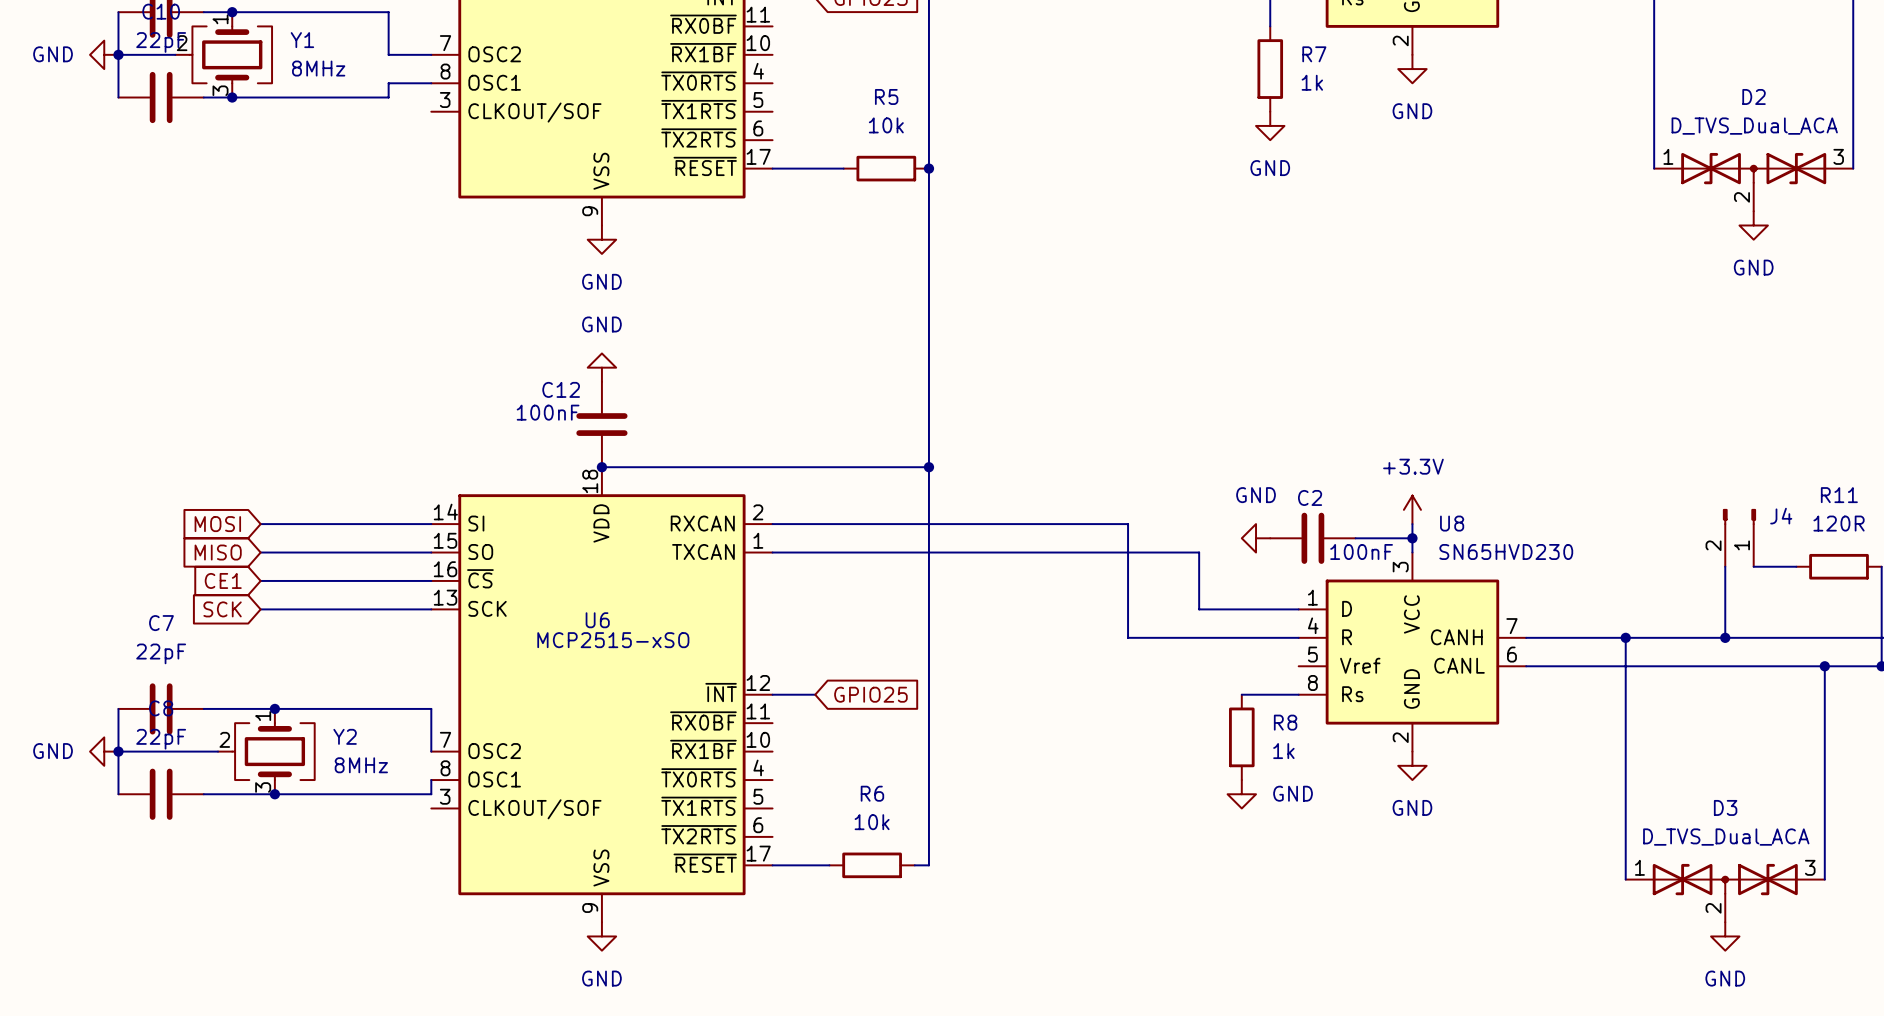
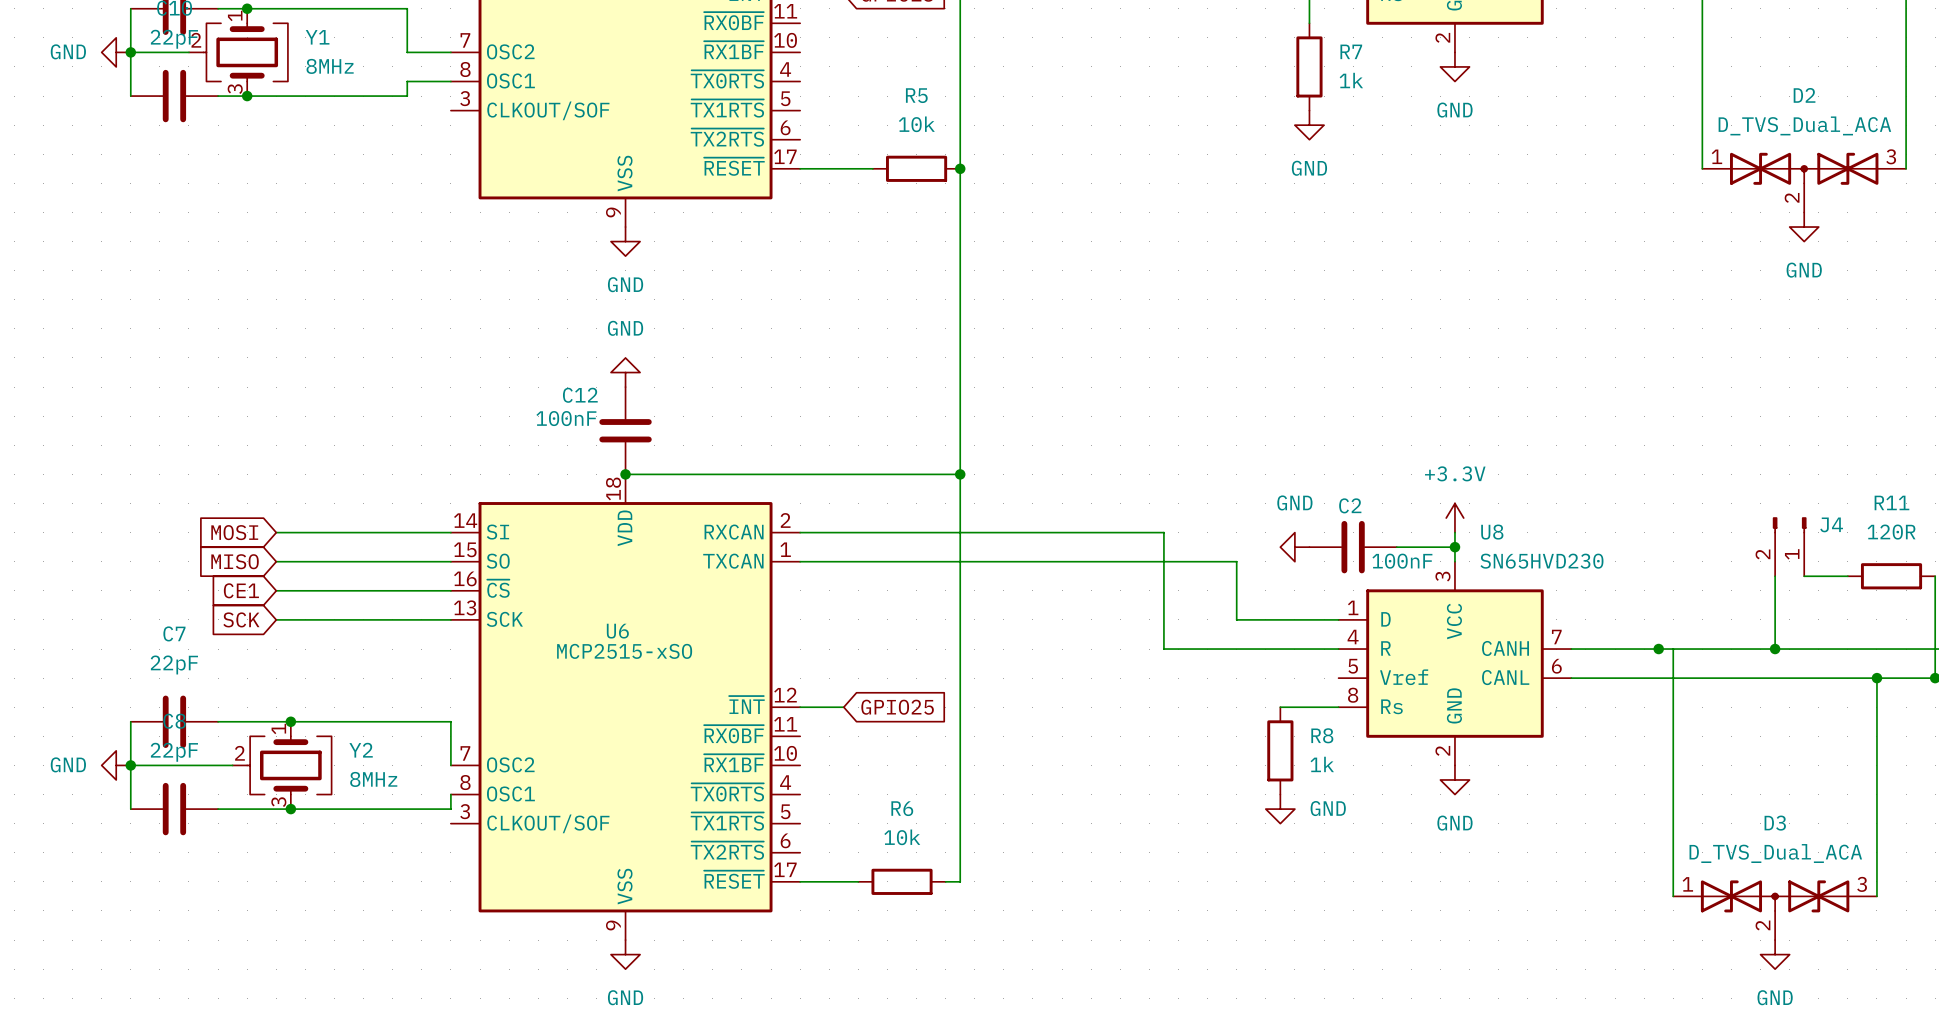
junction position: (1625, 637) -> (1658, 649)

